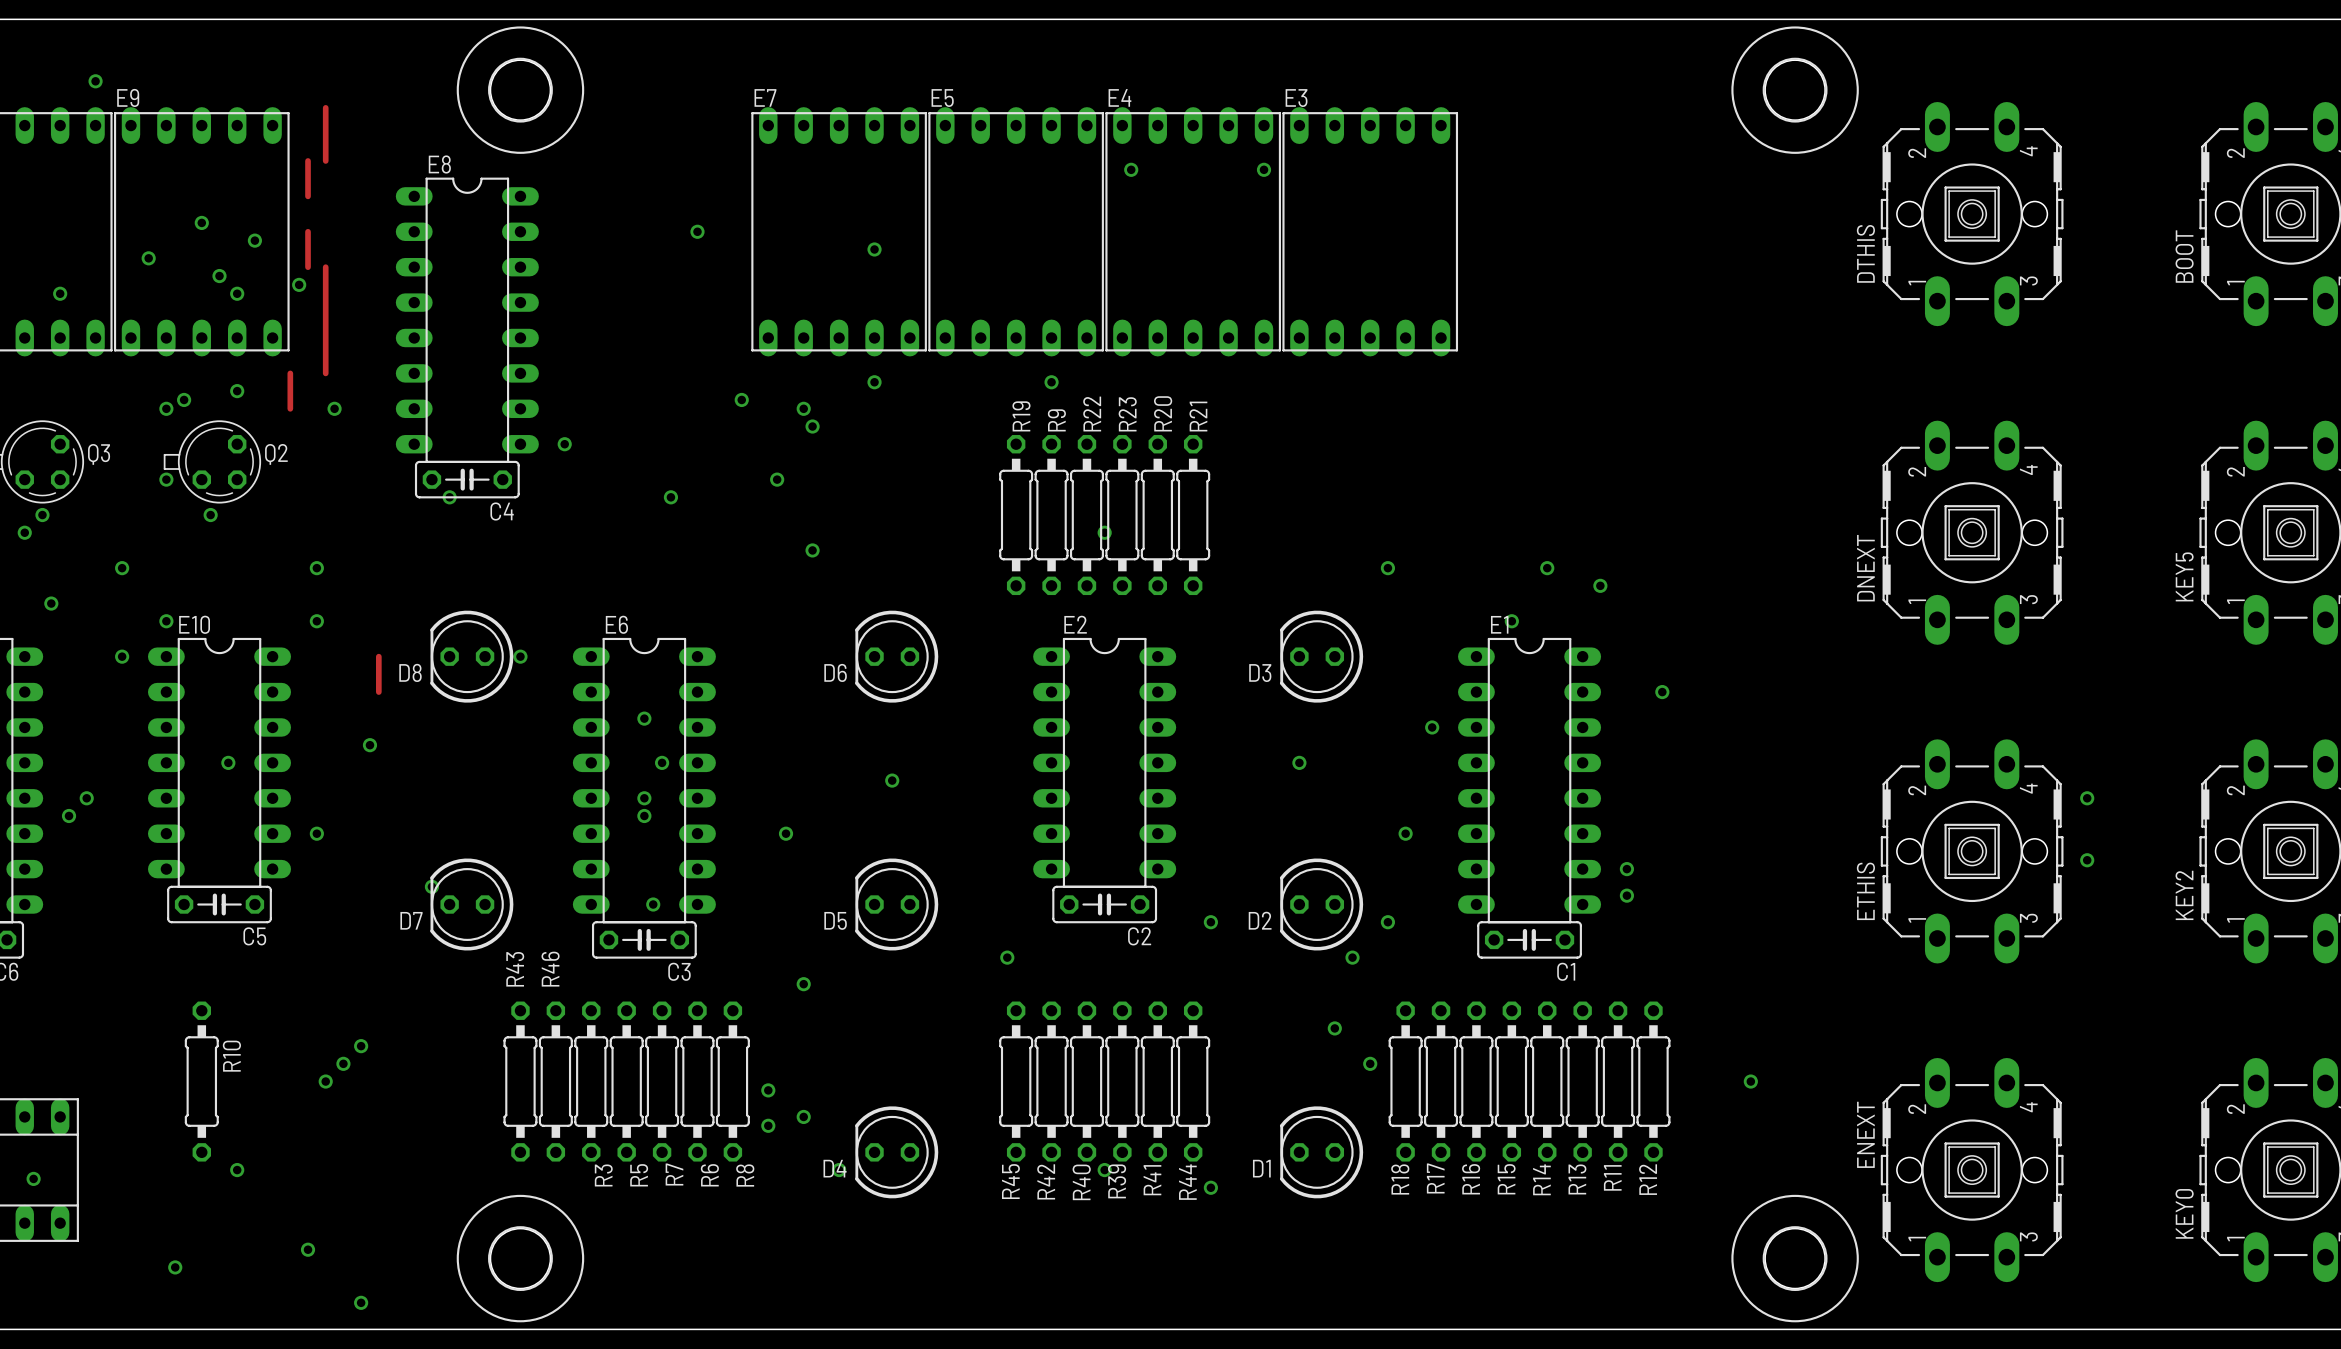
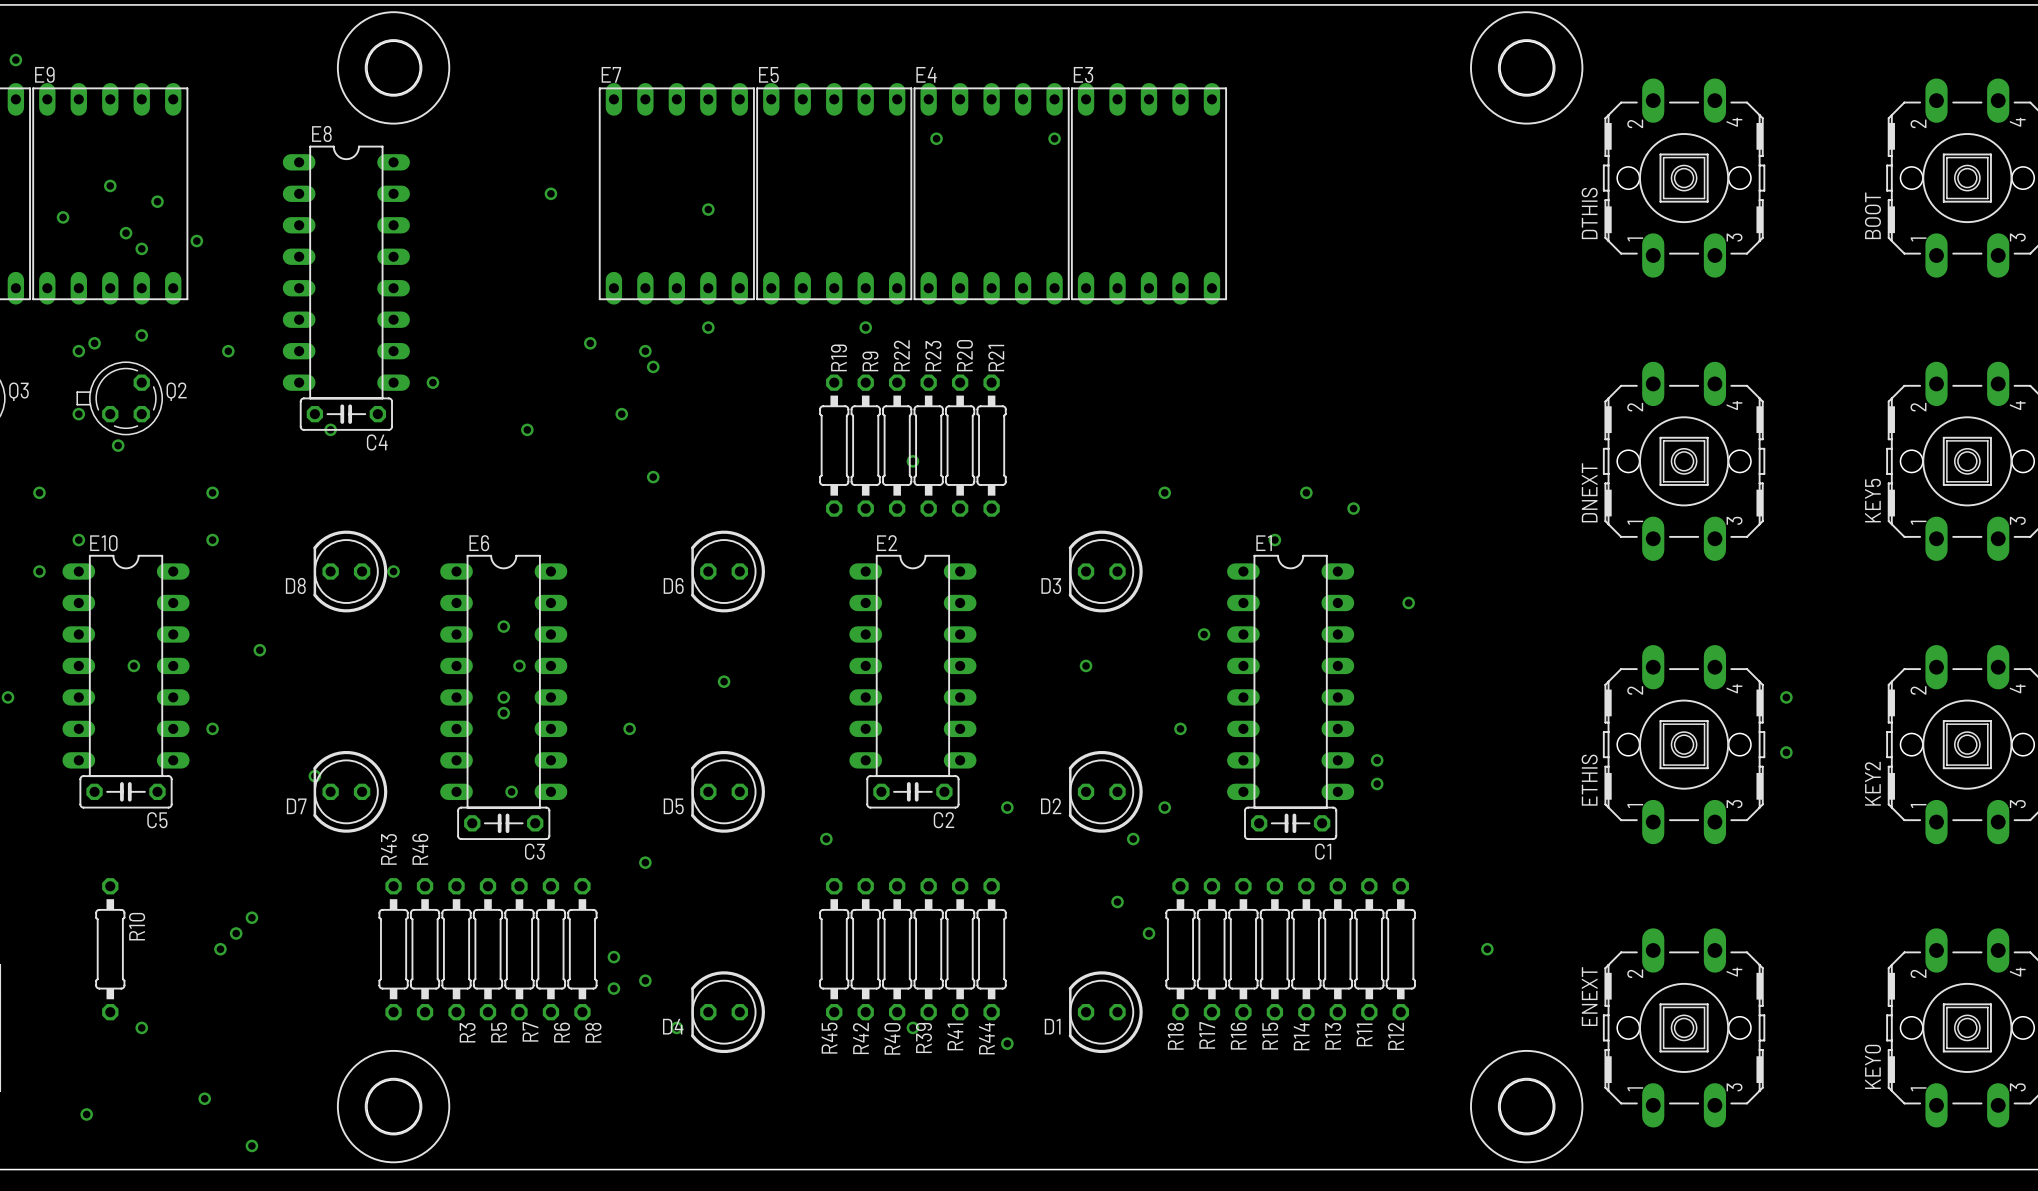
track: (325, 107) (325, 160) -> none
track: (308, 160) (308, 196) -> none
track: (308, 231) (308, 267) -> none
track: (325, 267) (325, 373) -> none
track: (290, 373) (290, 408) -> none
track: (378, 656) (378, 692) -> none

